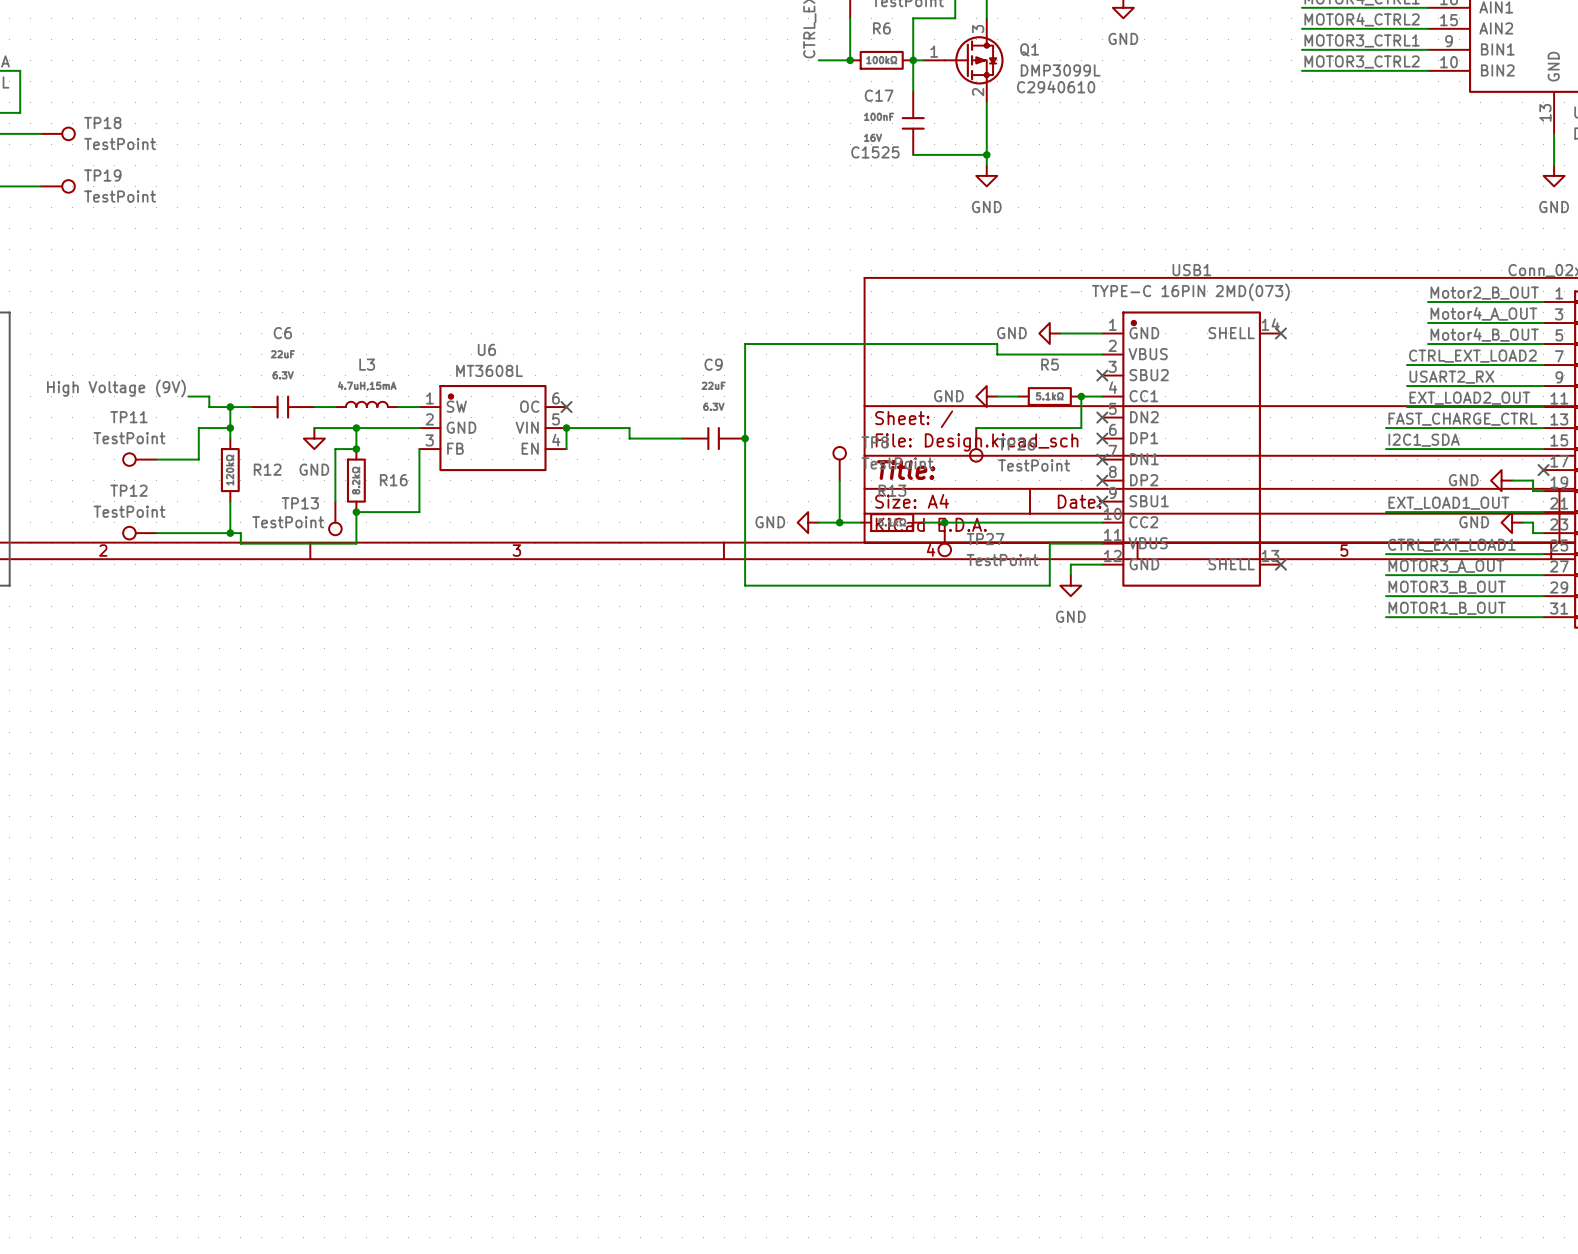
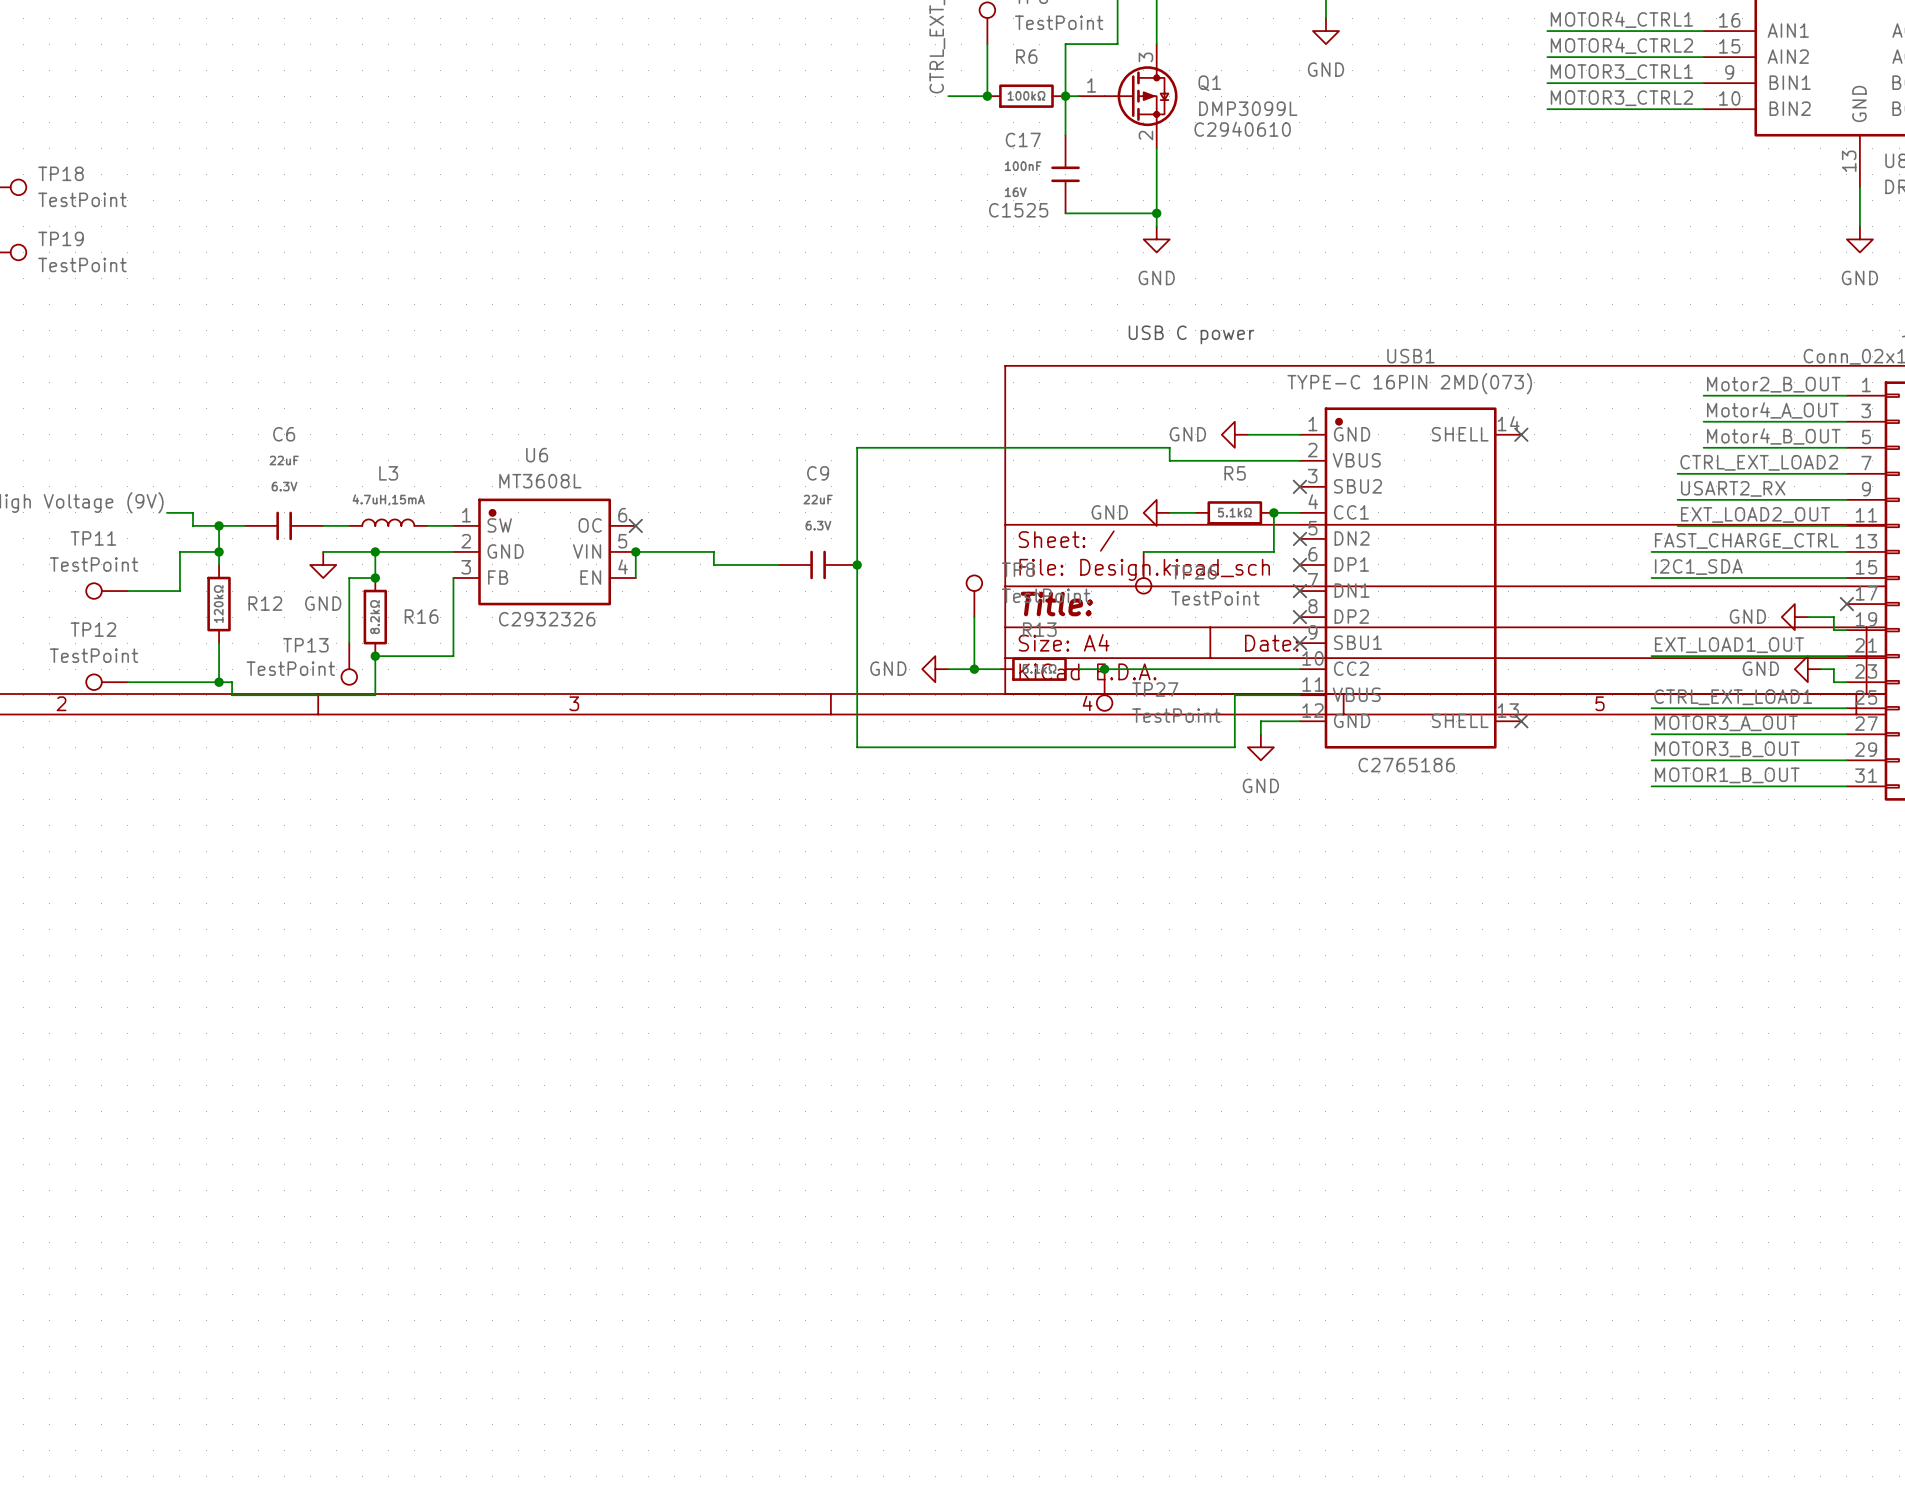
text: none -> USB C power (1191, 334)
U6 text: none -> C2932326 (547, 619)
USB1 text: none -> C2765186 (1406, 765)

